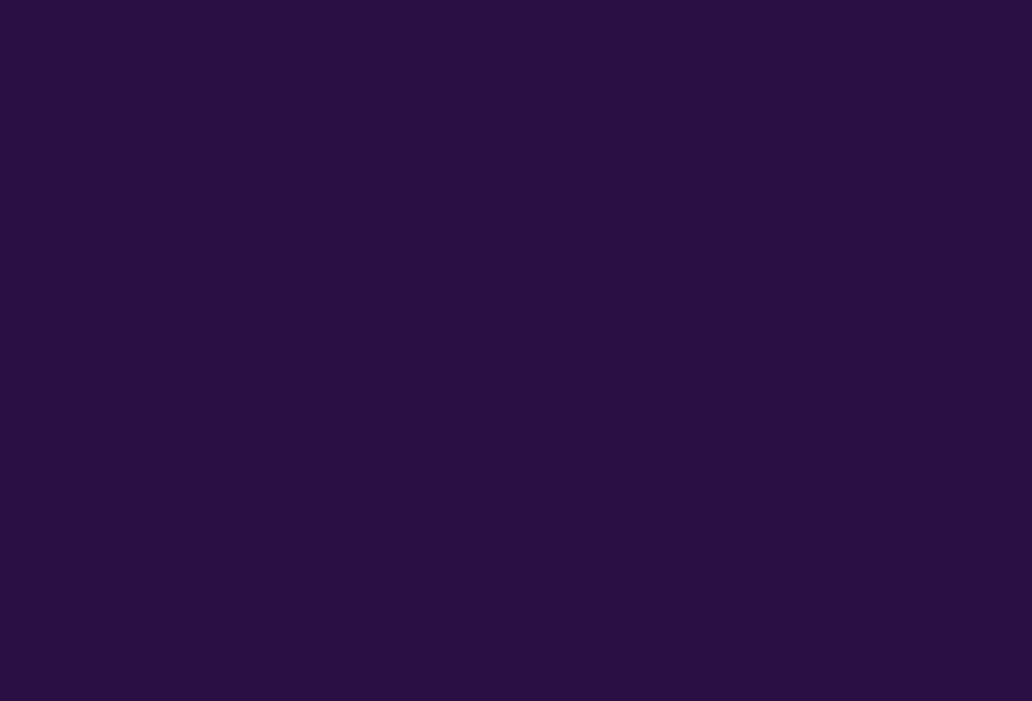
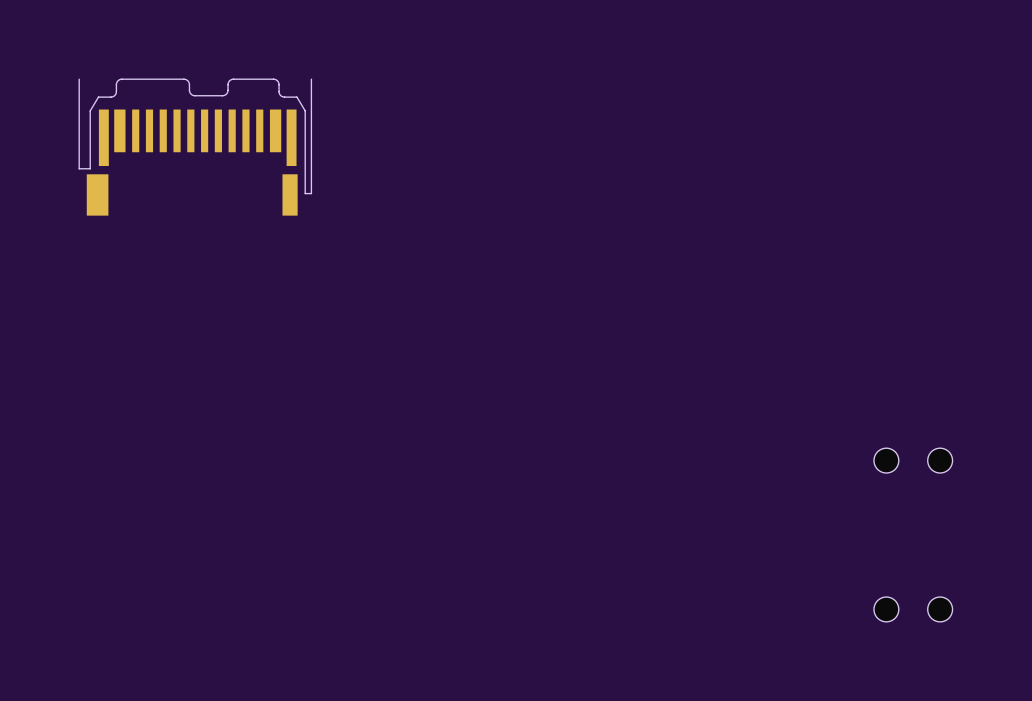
part: none -> (195, 147)
part: none -> (913, 460)
part: none -> (913, 609)

